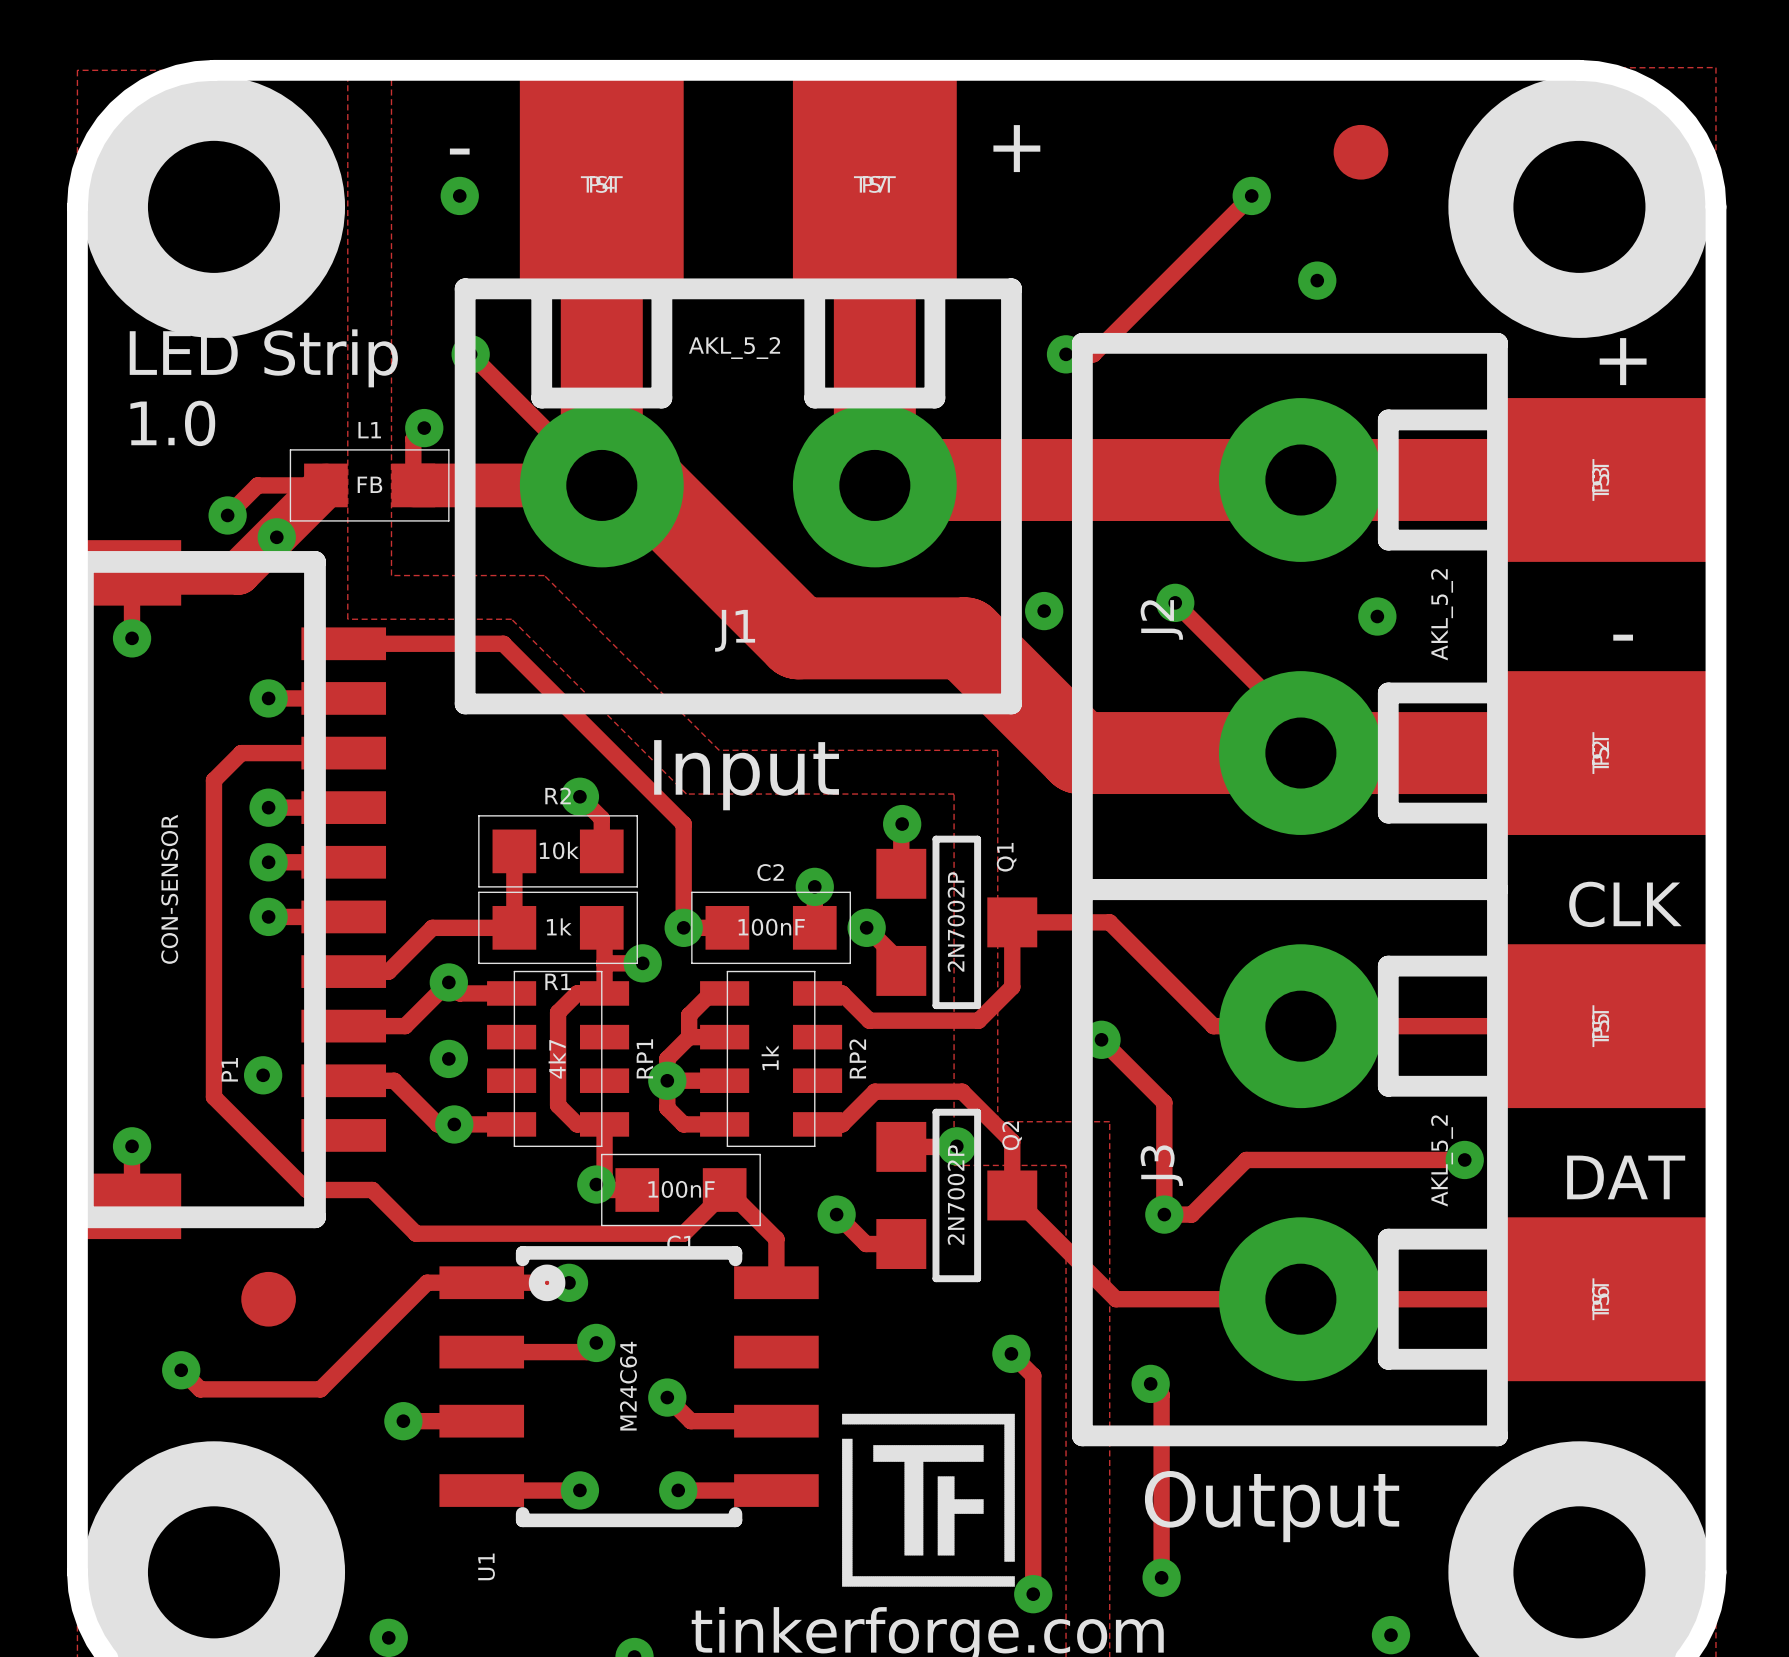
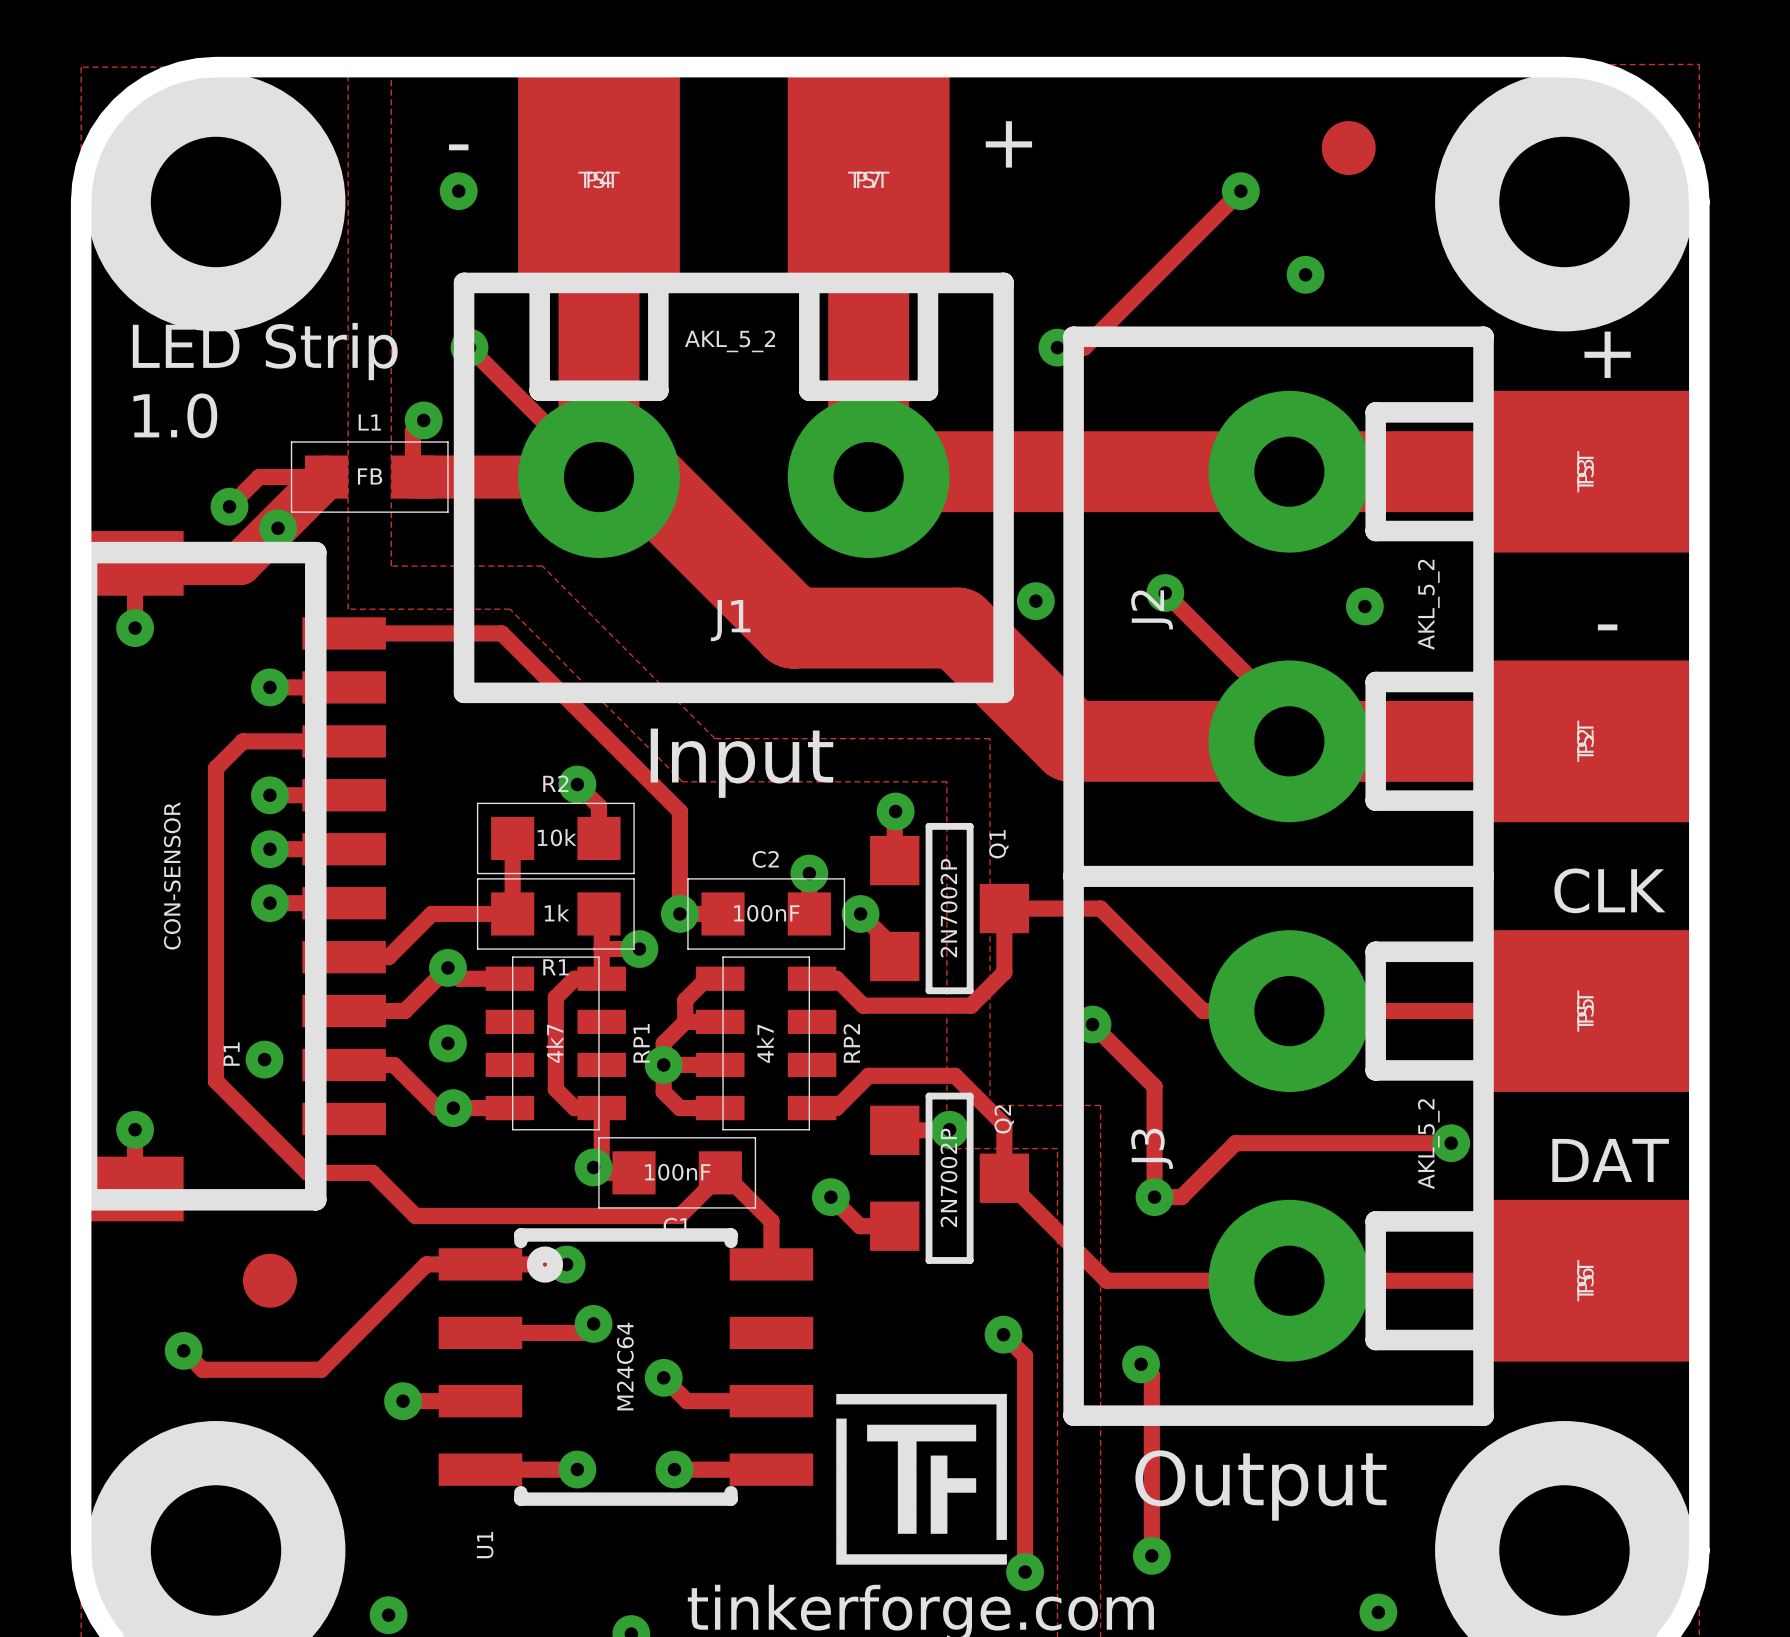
RP2 value: 1k (770, 1057) -> 4k7 (765, 1043)

